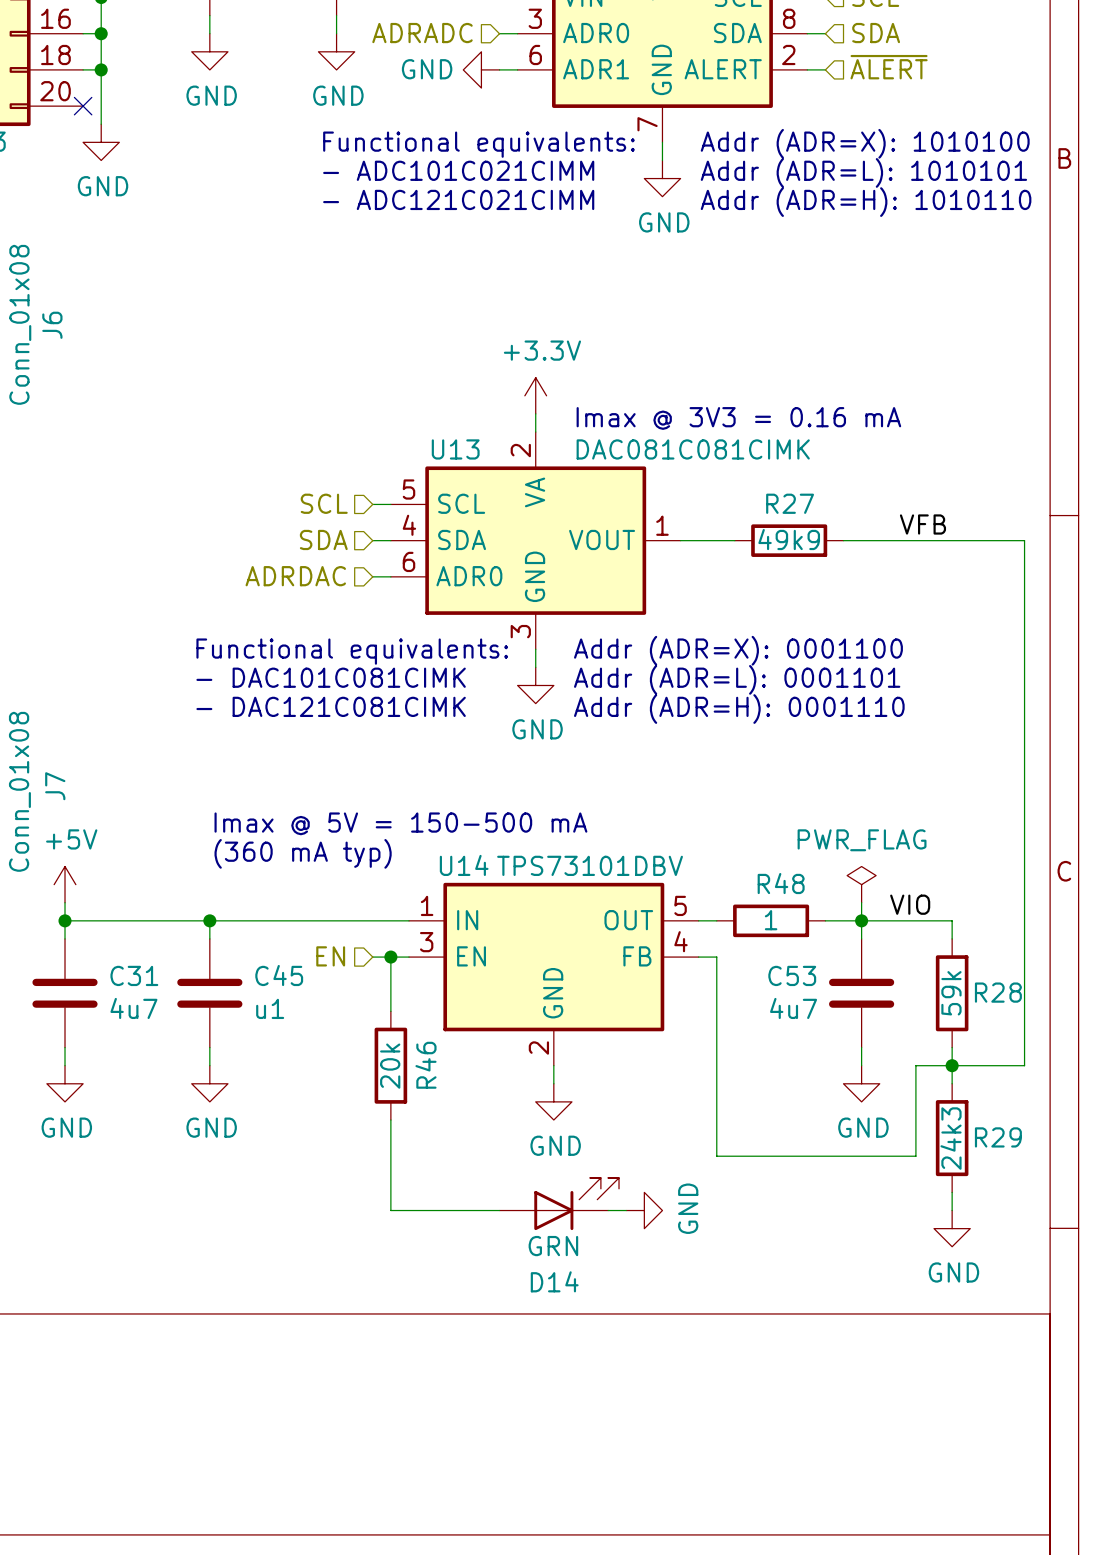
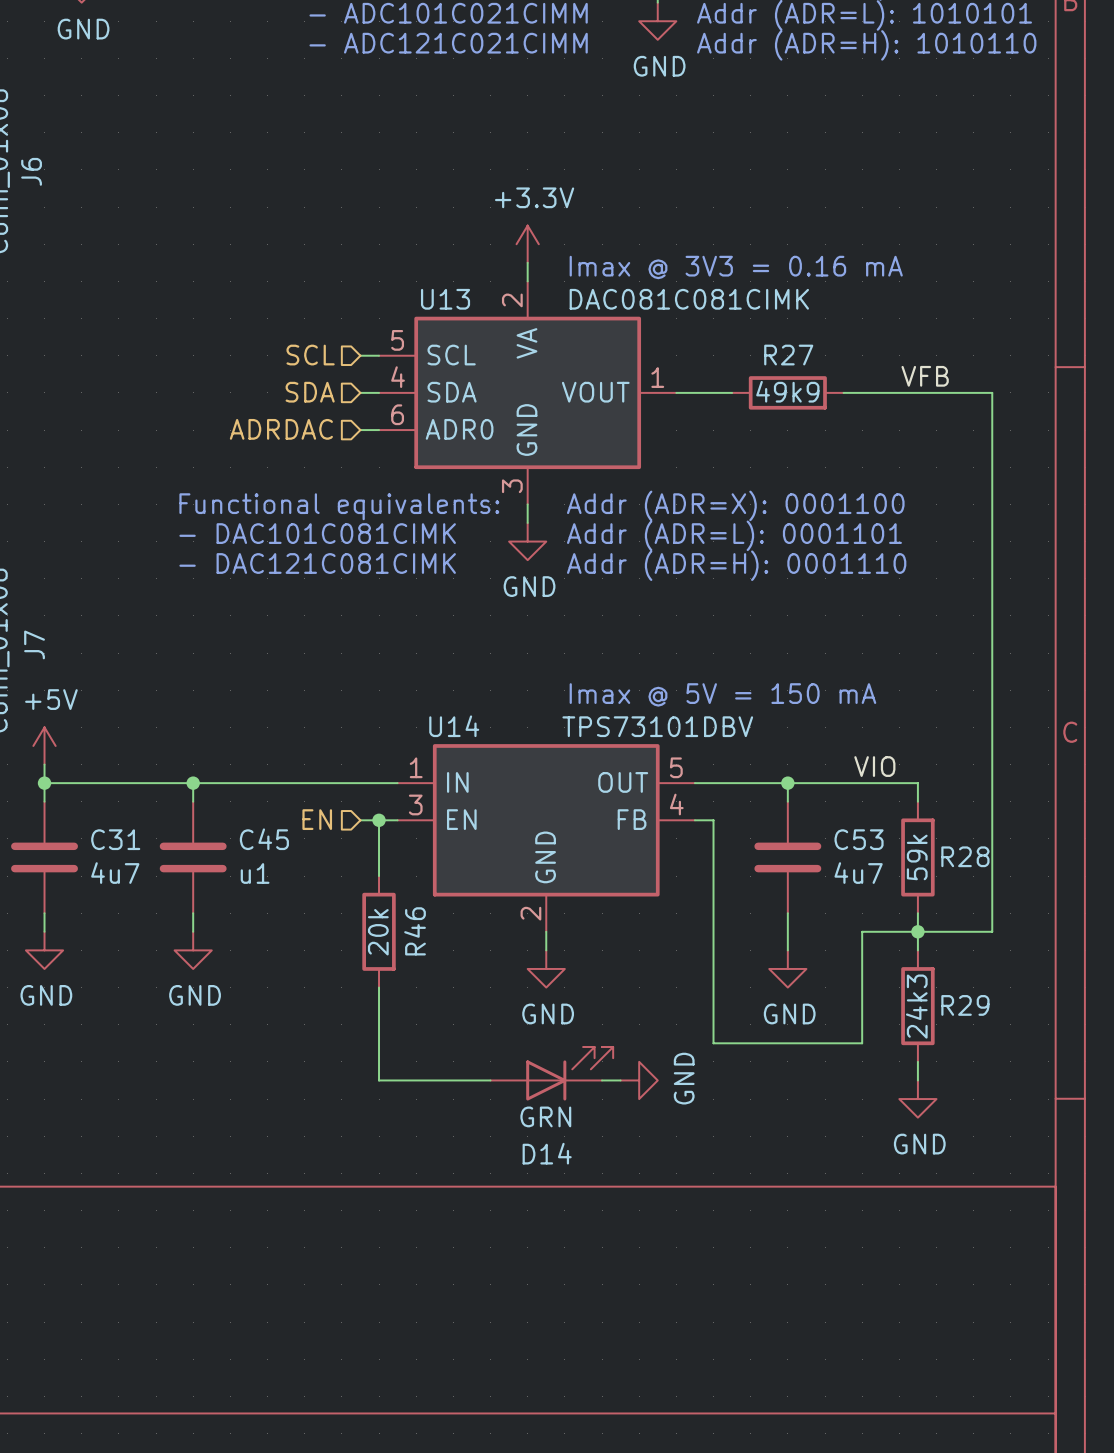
wire: (988, 540) (1024, 540) (1024, 1065) (988, 1065) -> (992, 392) (992, 931)
text: Imax @ 5V = 150-500 mA (400, 823) -> none
text: none -> Imax @ 5V = 150 mA (722, 694)
text: (360 mA typ) (303, 853) -> none
U14 value position: TPS73101DBV (590, 865) -> TPS73101DBV (657, 726)
power symbol: PWR_FLAG (861, 884) -> none
wire: (861, 902) (861, 938) -> (787, 913) (787, 950)
label position: VIO (910, 904) -> VIO (874, 766)
wire: none -> (713, 783) (825, 783)
R48: 1 (771, 920) -> none
junction position: (861, 920) -> (787, 783)
wire: (915, 920) (952, 920) (952, 938) -> (917, 783) (917, 801)
C53 name position: C53 (792, 975) -> C53 (859, 839)
C53 position: (861, 993) -> (787, 857)
R28 position: (952, 993) -> (917, 857)
C53 value position: 4u7 (793, 1008) -> 4u7 (858, 873)
wire: (861, 1047) (861, 1065) -> (787, 783) (787, 801)
wire: (952, 1047) (952, 1083) -> none
junction position: (952, 1065) -> (917, 931)
power symbol position: GND (861, 1083) -> GND (787, 968)
wire: (915, 1083) (915, 1156) (716, 1156) -> (917, 913) (917, 931) (862, 931) (862, 1043) (713, 1043) (713, 1024)
R29 position: (952, 1138) -> (917, 1006)
wire: (952, 1192) (952, 1210) -> (917, 1061) (917, 1080)
power symbol position: GND (952, 1228) -> GND (917, 1099)

